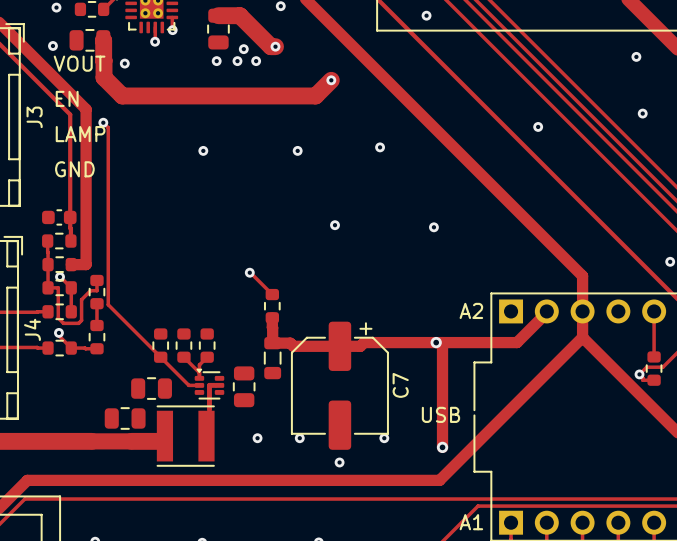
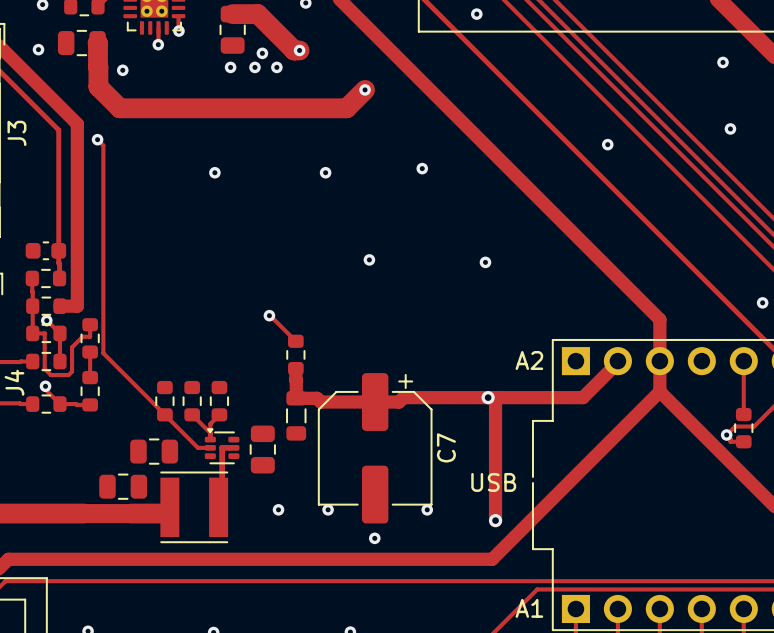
text: VOUT (79, 63) -> none
text: EN (67, 98) -> none
text: LAMP (80, 134) -> none
text: GND (74, 169) -> none

